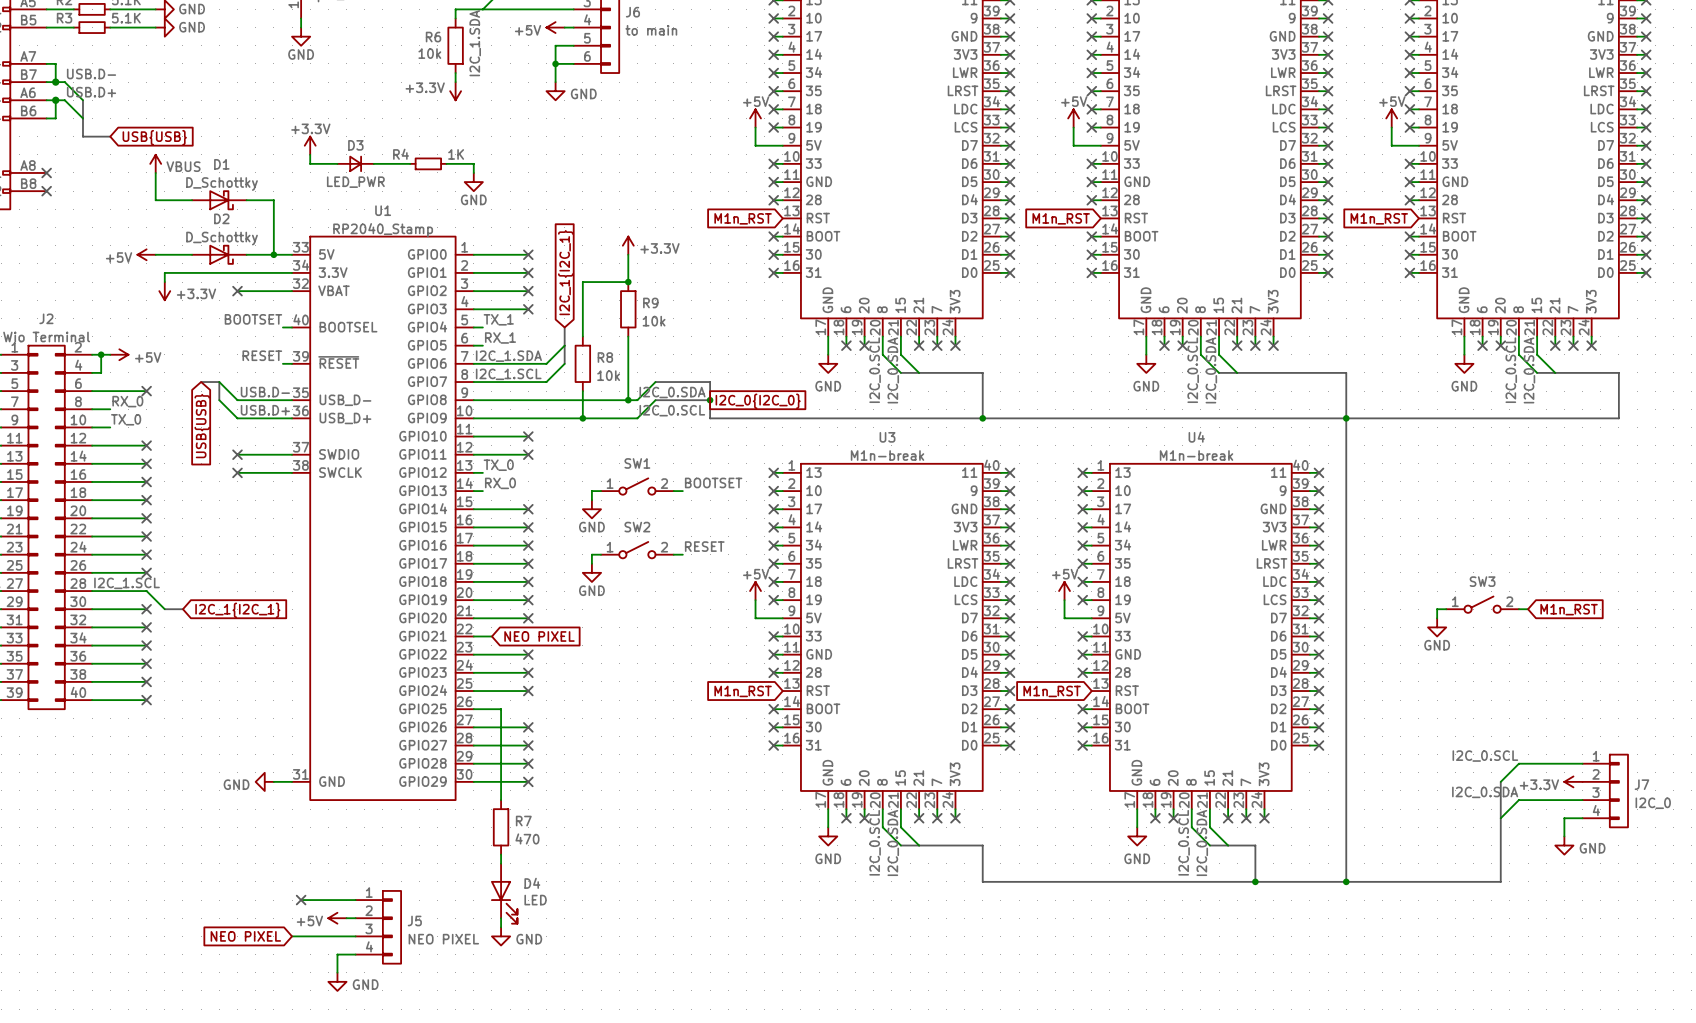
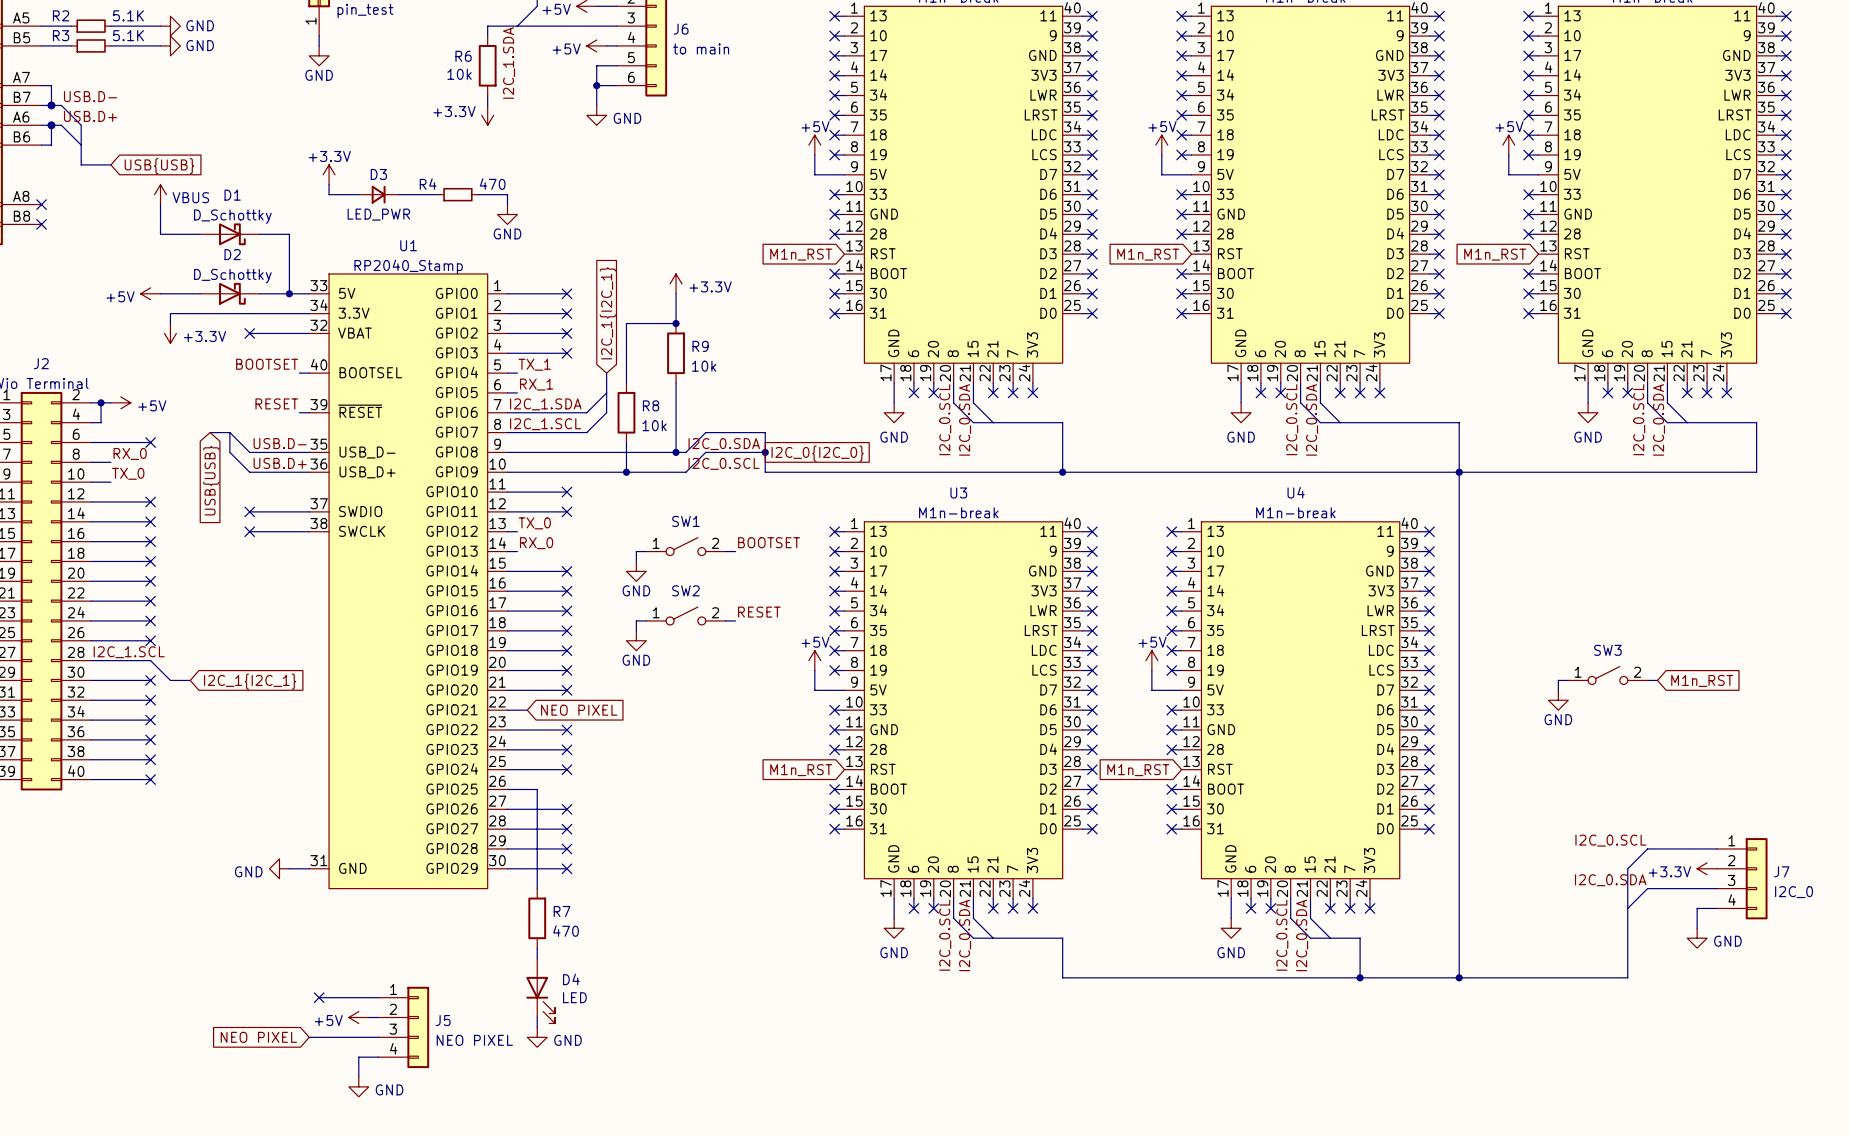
R4 value: 1K (456, 154) -> 470 (492, 184)

